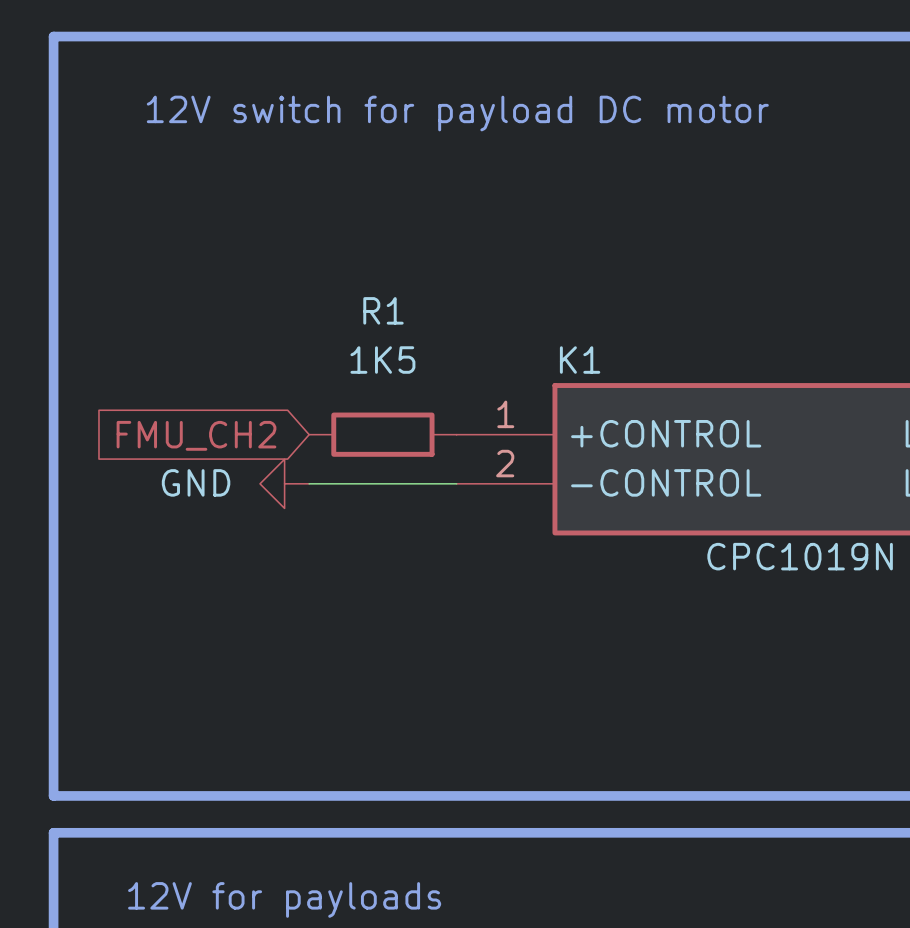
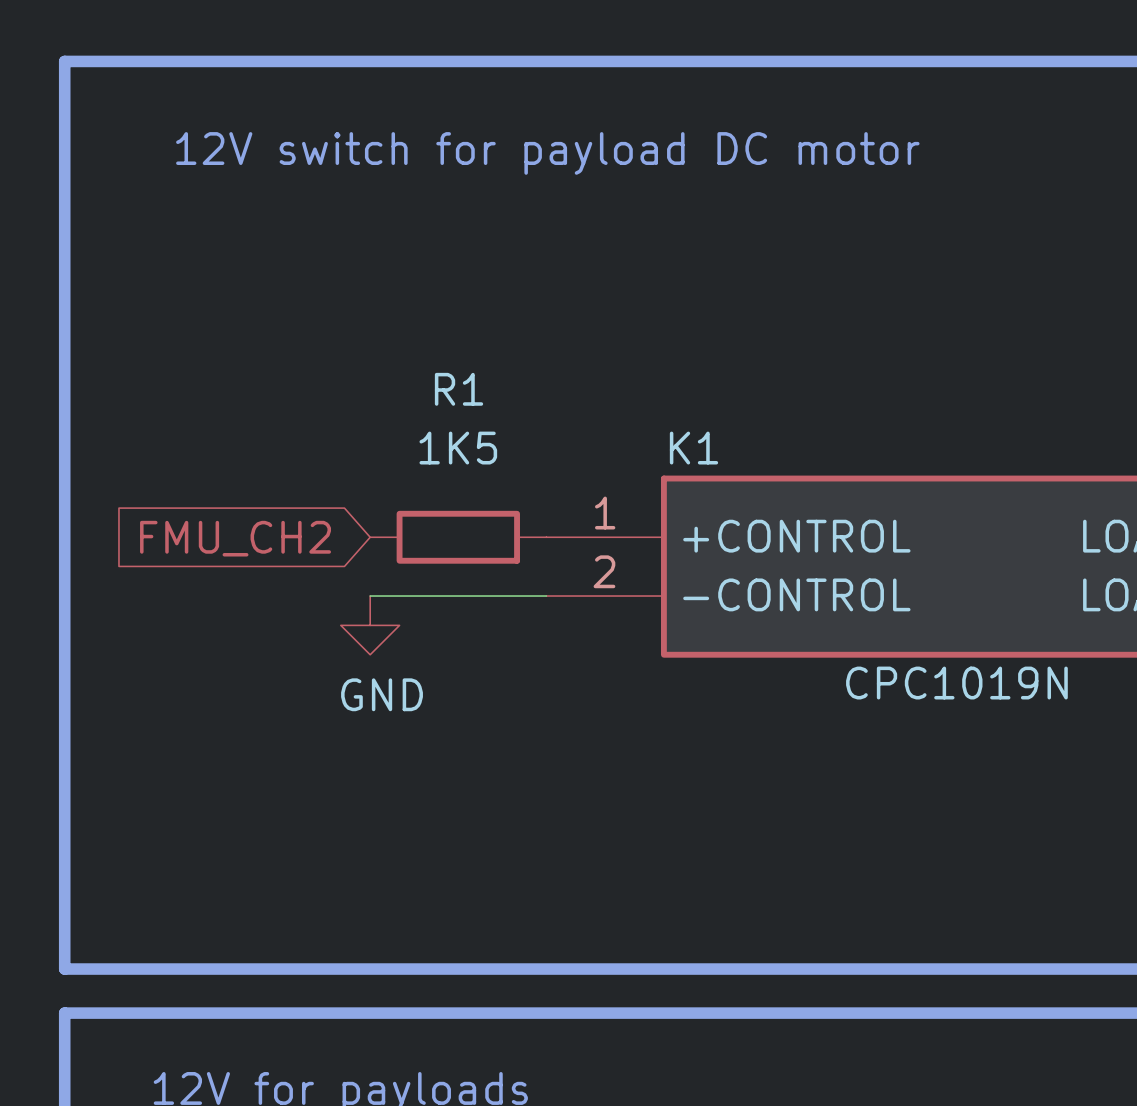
power symbol text position: GND (196, 482) -> GND (382, 694)
power symbol rotation: 0° (284, 483) -> 90° counterclockwise (370, 625)
power symbol position: GND (284, 483) -> GND (370, 625)

